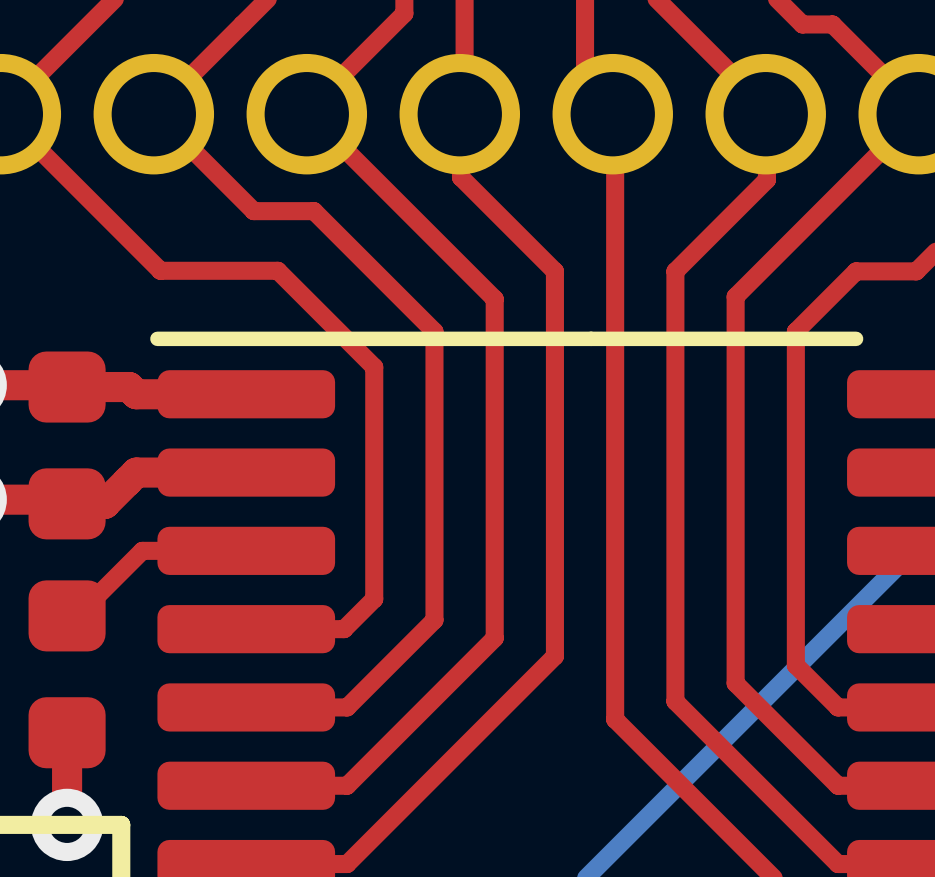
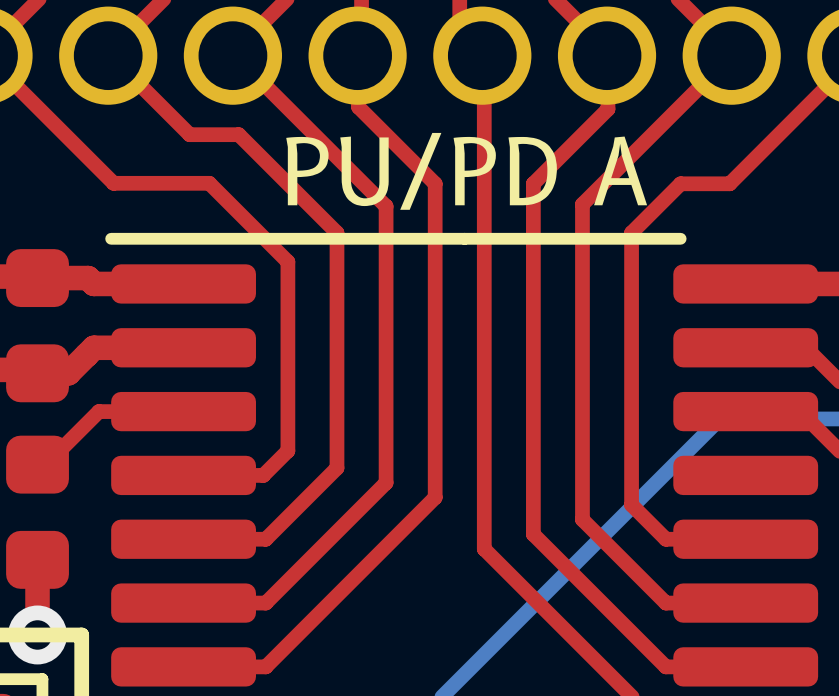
text: none -> PU/PD A (466, 171)

